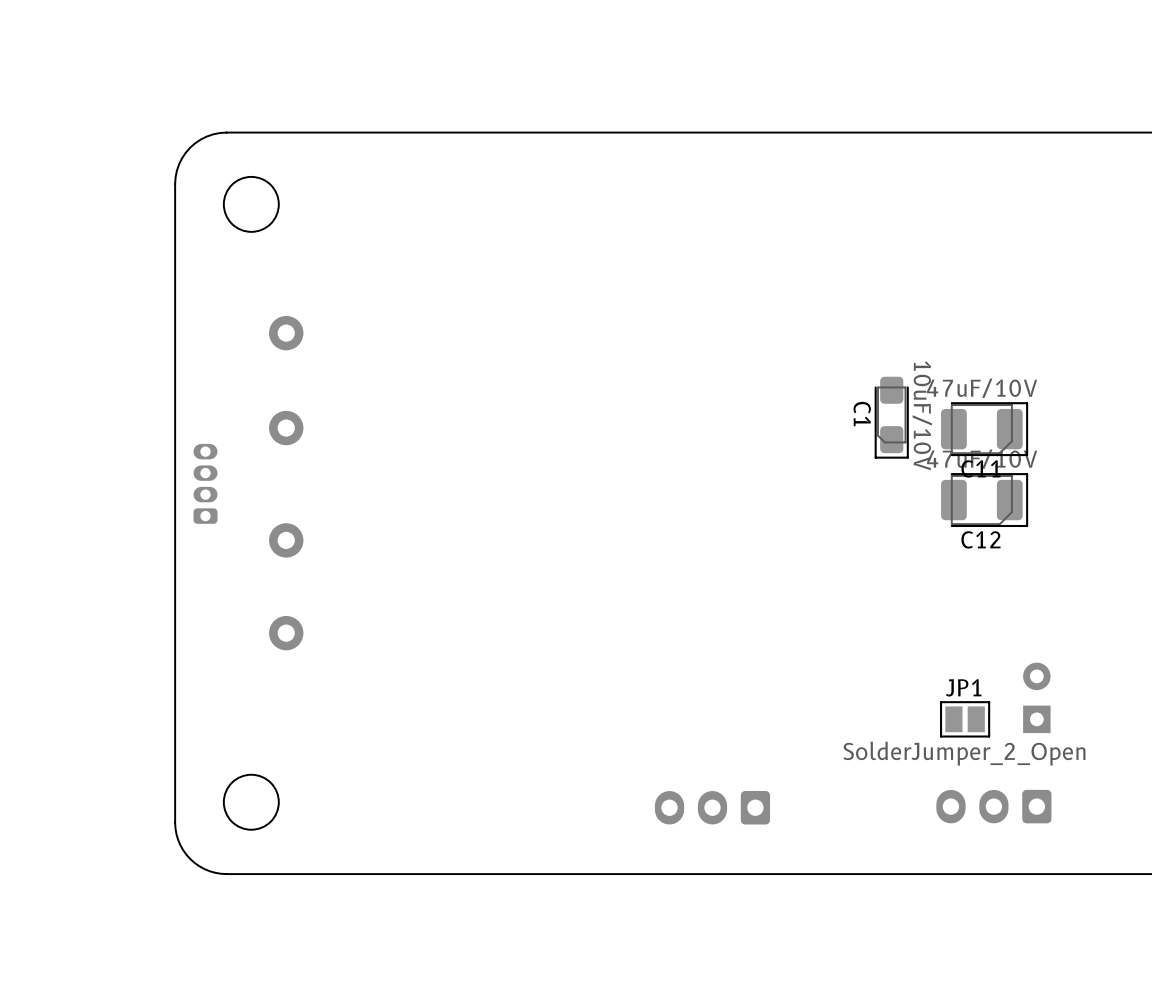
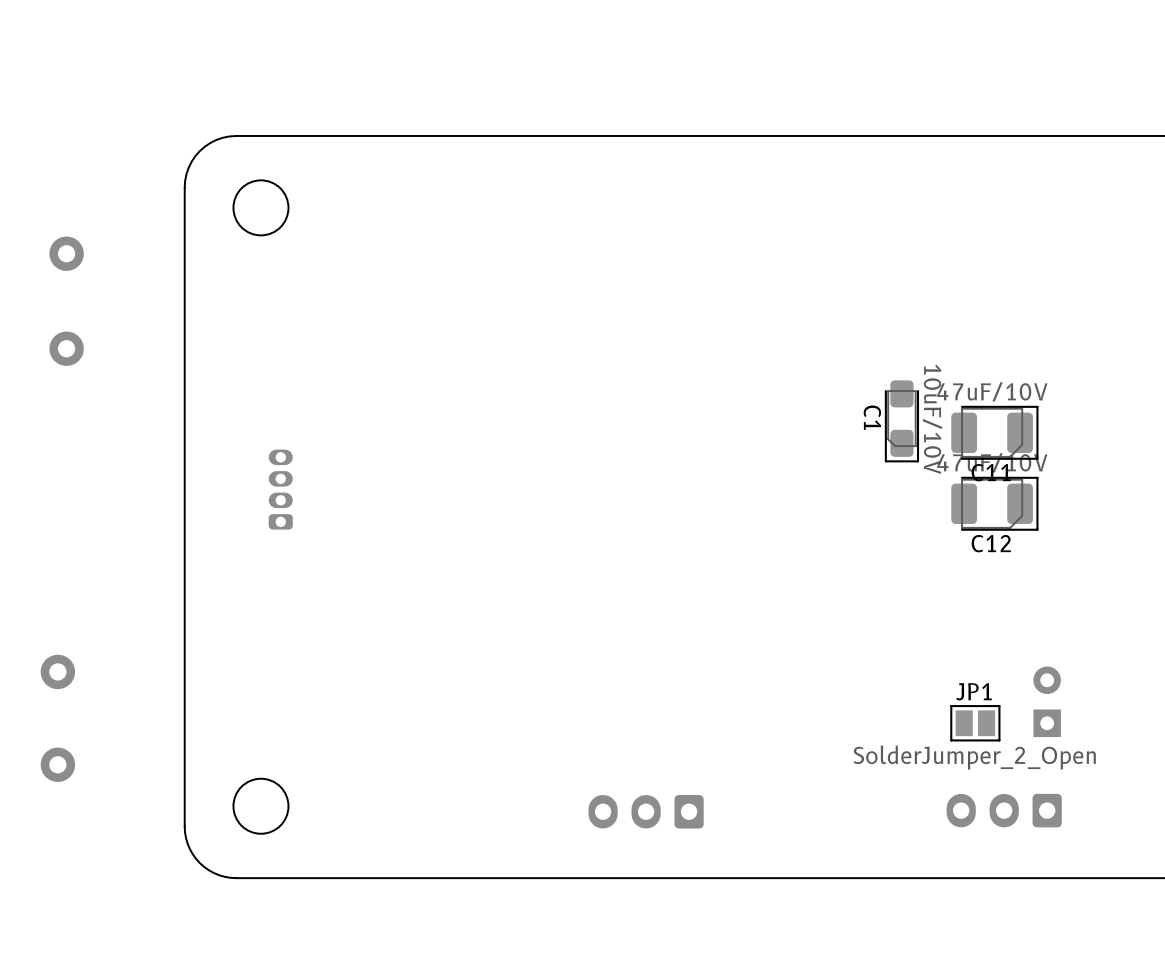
part: none -> (66, 253)
part: (286, 333) -> none
part: none -> (66, 348)
part: (286, 428) -> none
part position: (205, 483) -> (280, 489)
part: (286, 540) -> none
part: (286, 633) -> none
part: none -> (57, 671)
part: none -> (57, 764)
part position: (712, 807) -> (646, 811)

